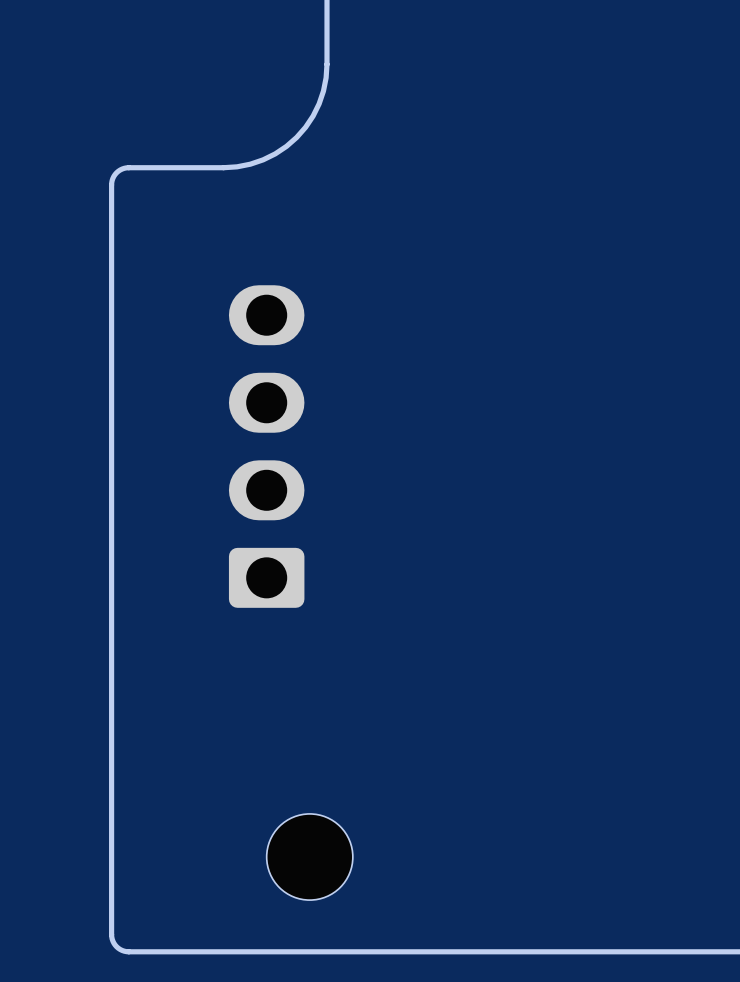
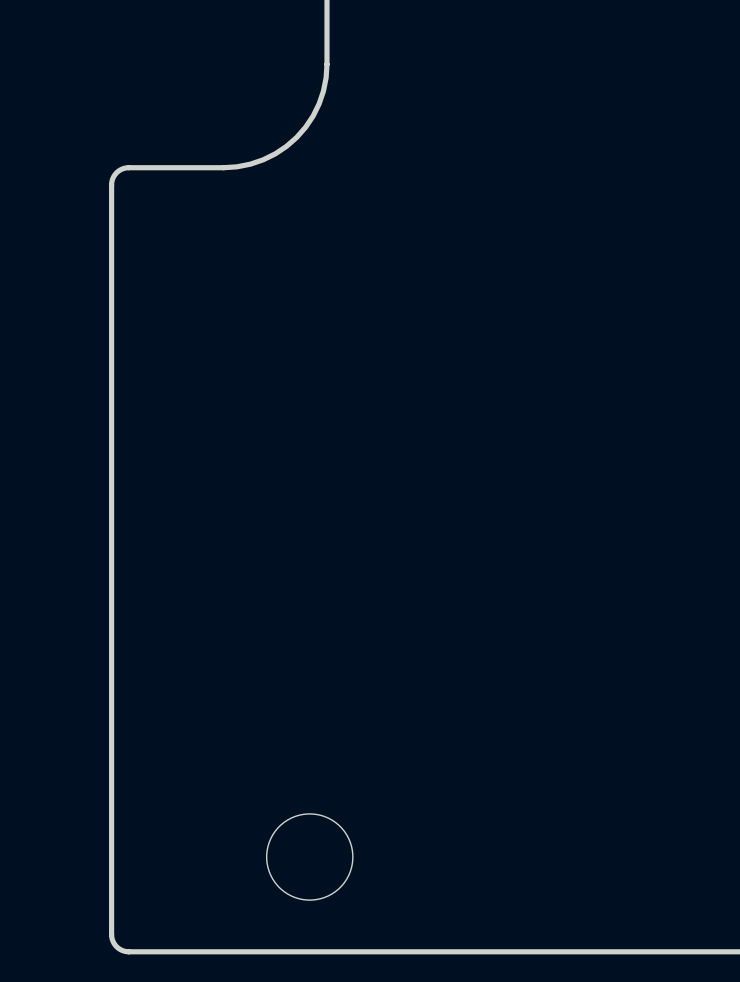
part: (266, 446) -> none

